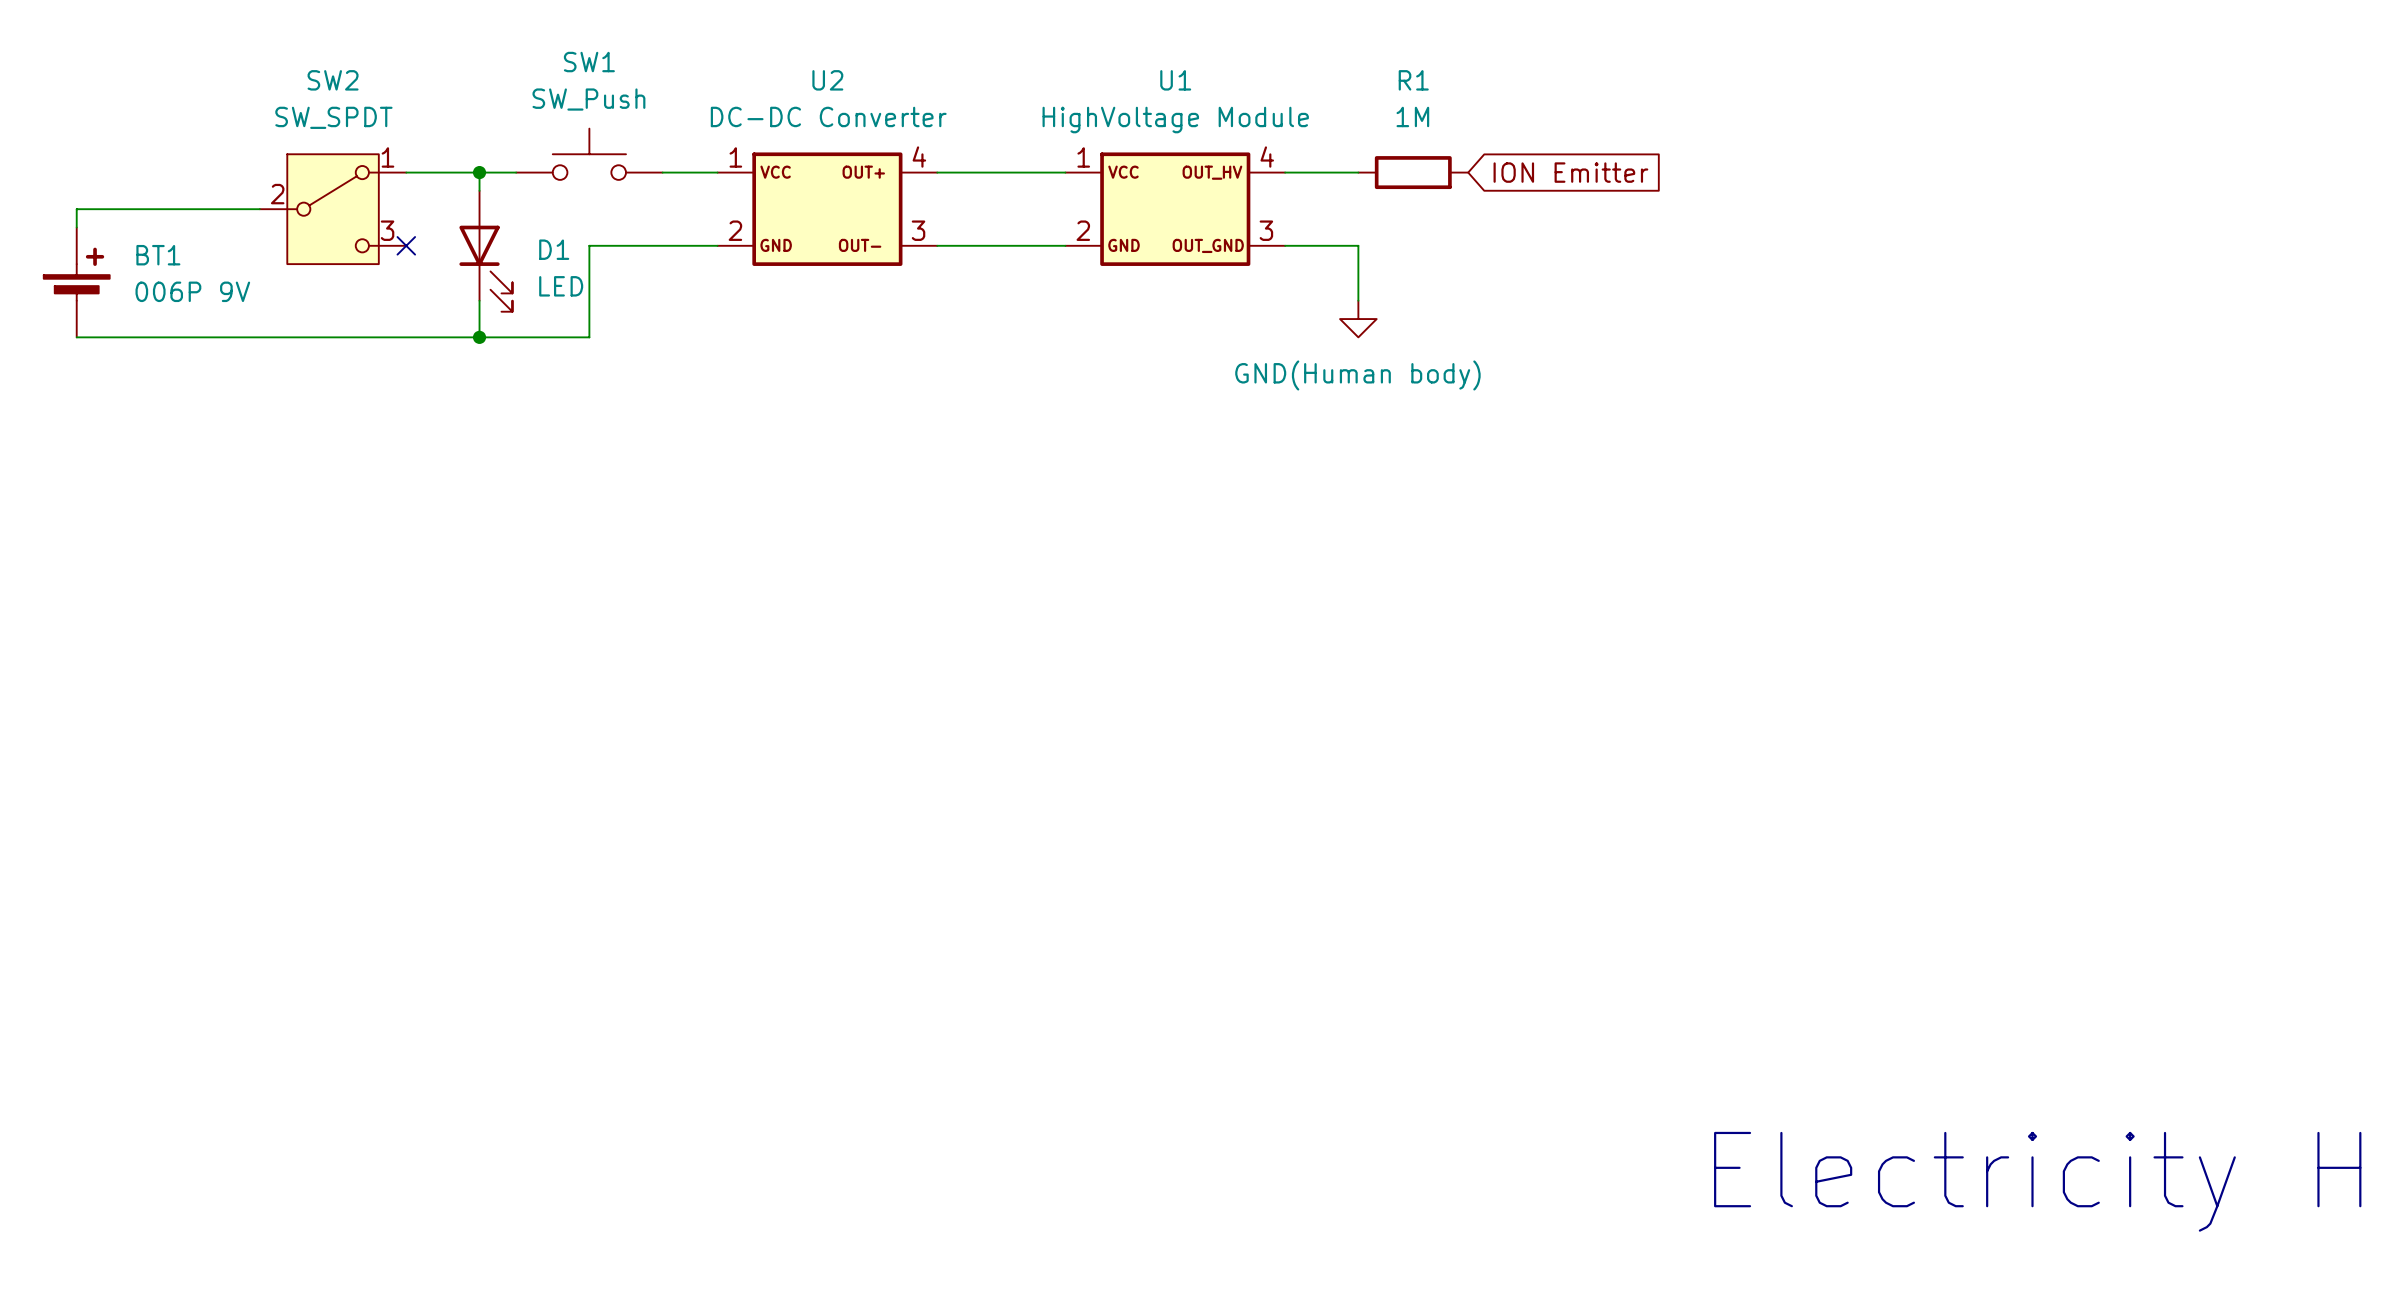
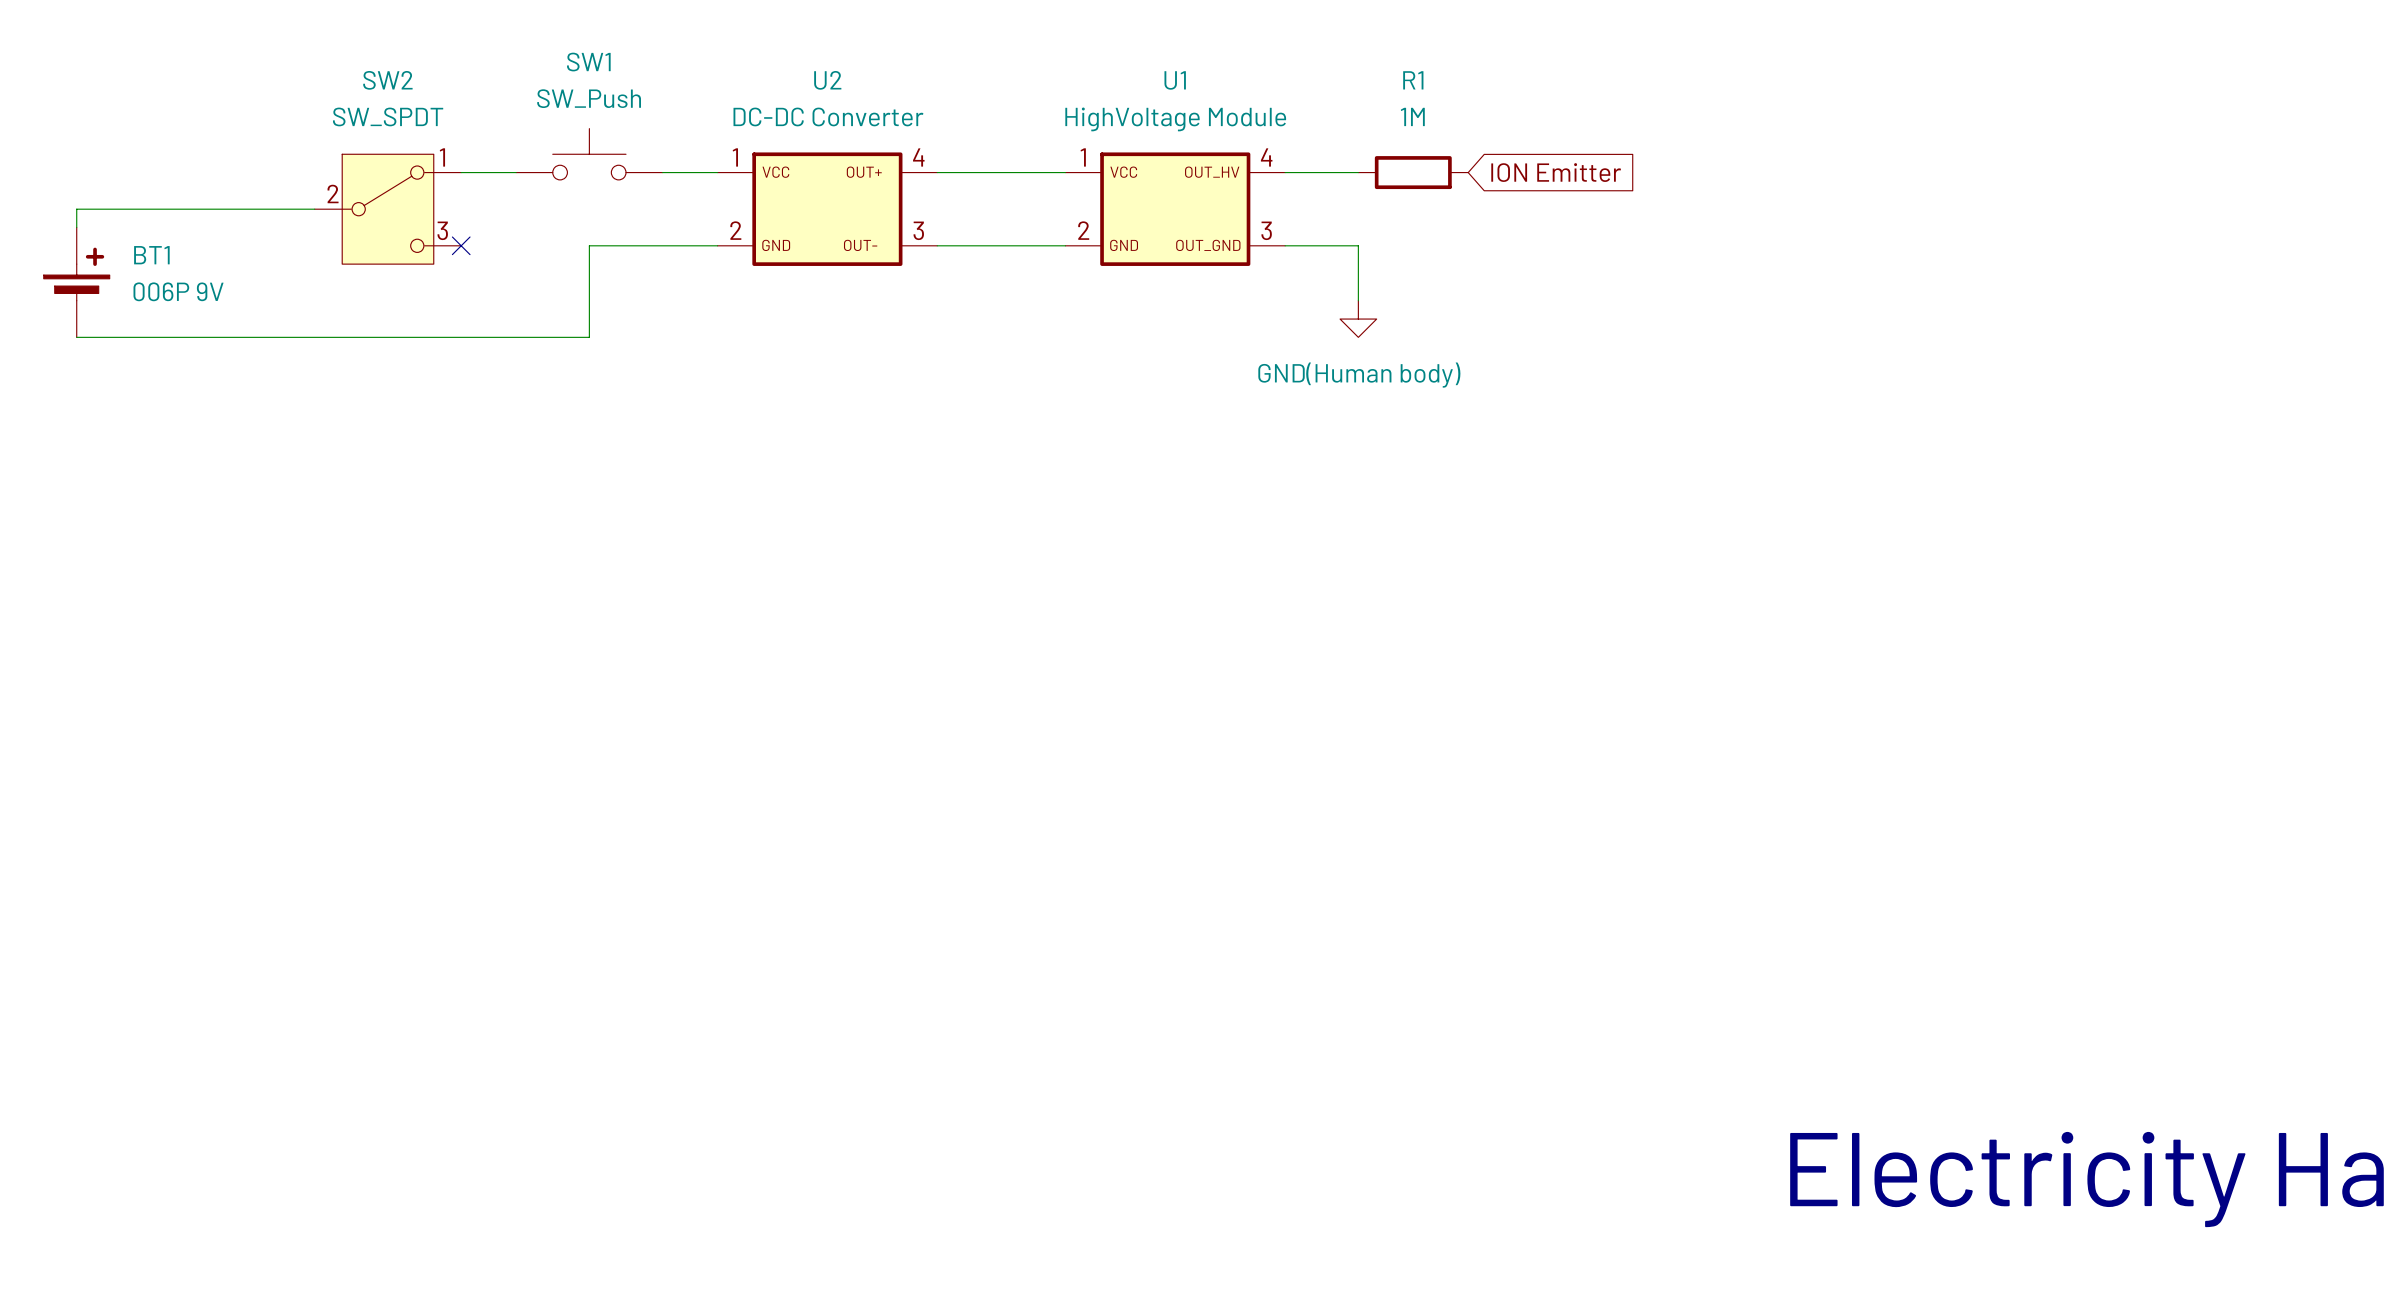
wire: (479, 172) (479, 190) -> none
junction: (479, 172) -> none
SW2 position: (333, 209) -> (387, 209)
no-connect mark position: (406, 245) -> (461, 245)
D1: LED (485, 251) -> none
wire: (479, 300) (479, 337) -> none
junction: (479, 337) -> none

